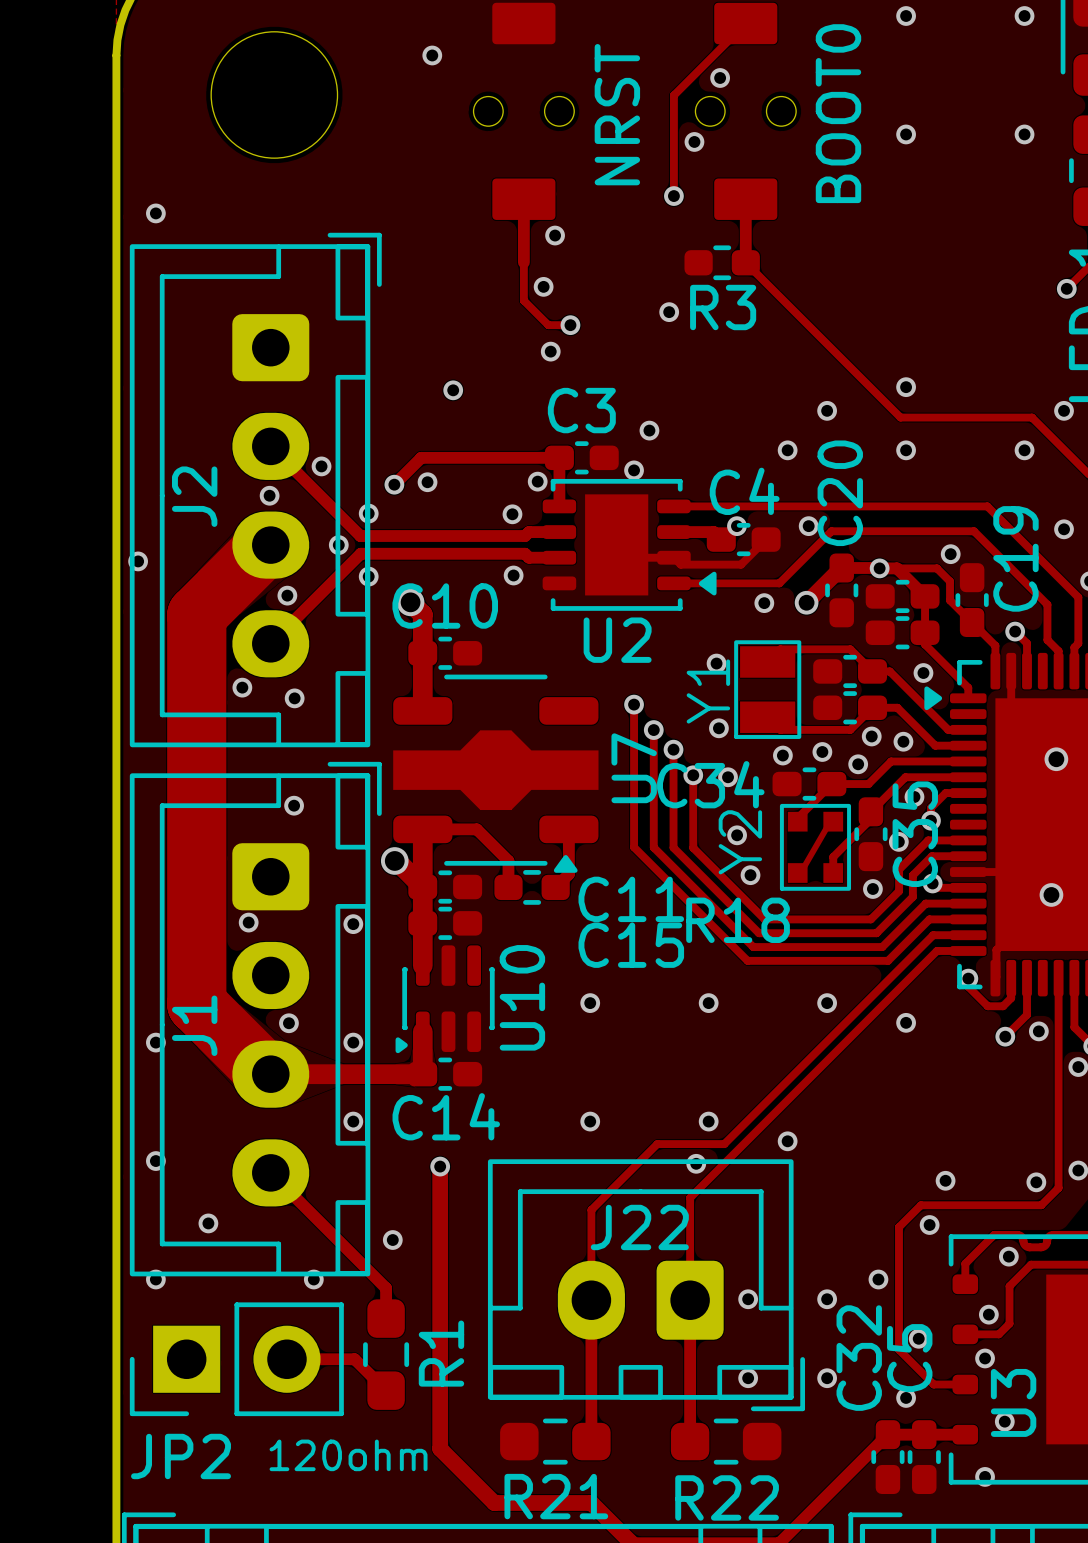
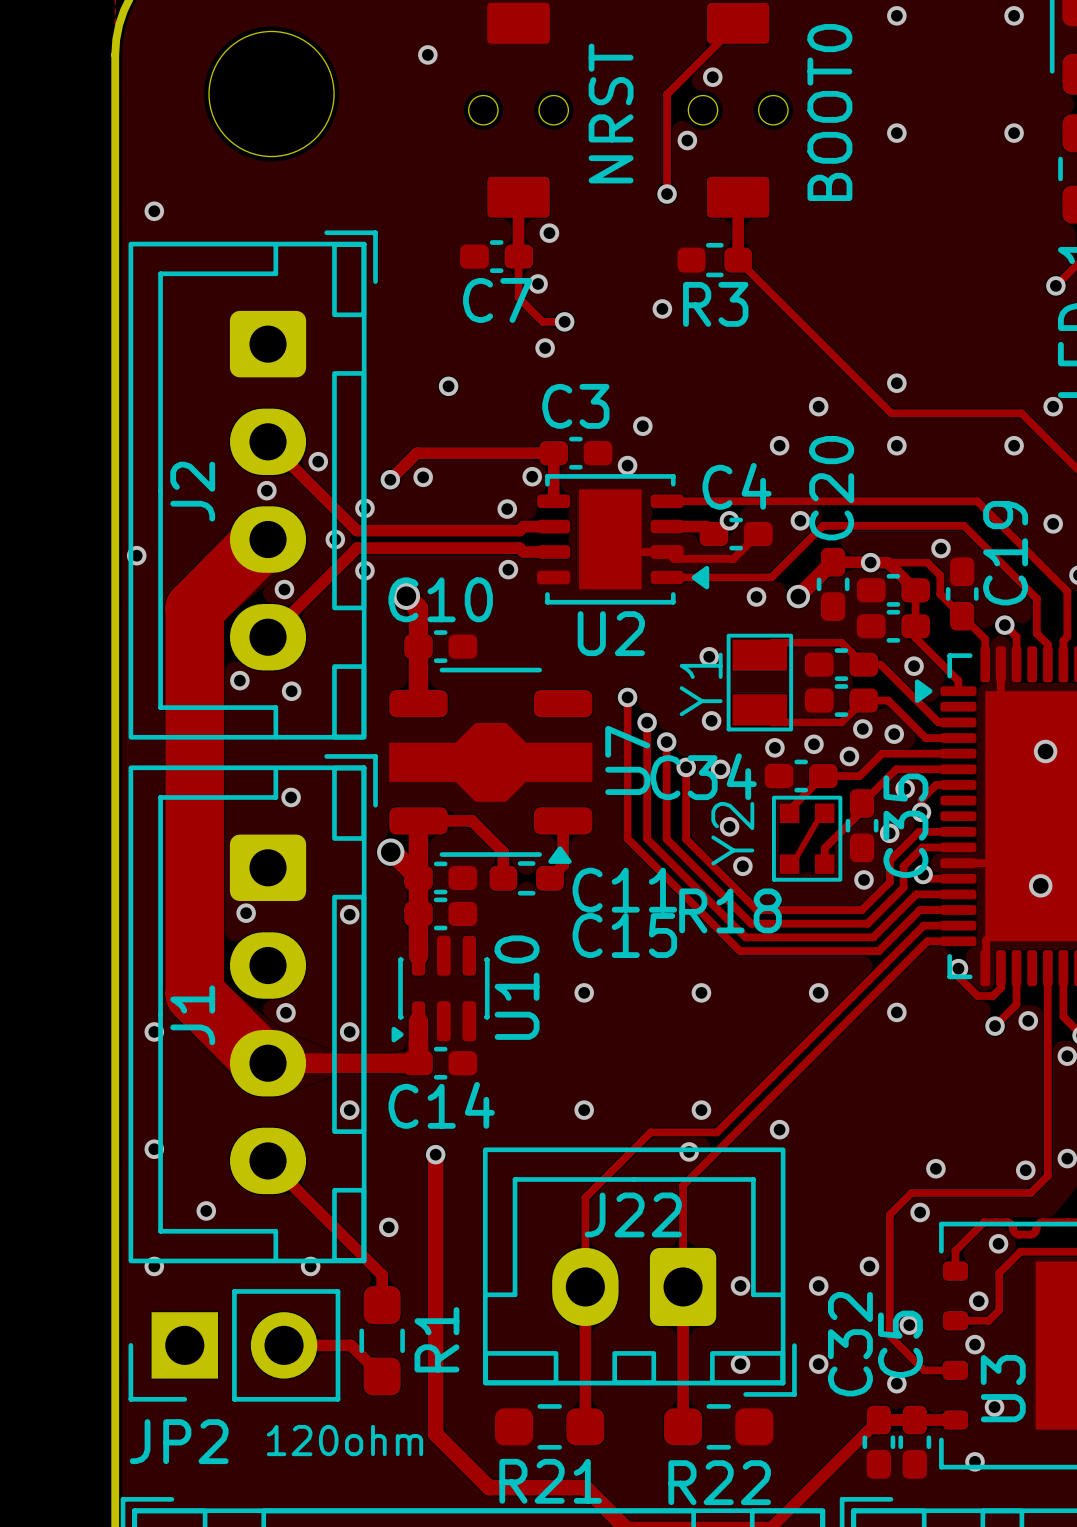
C7: none -> (496, 256)

